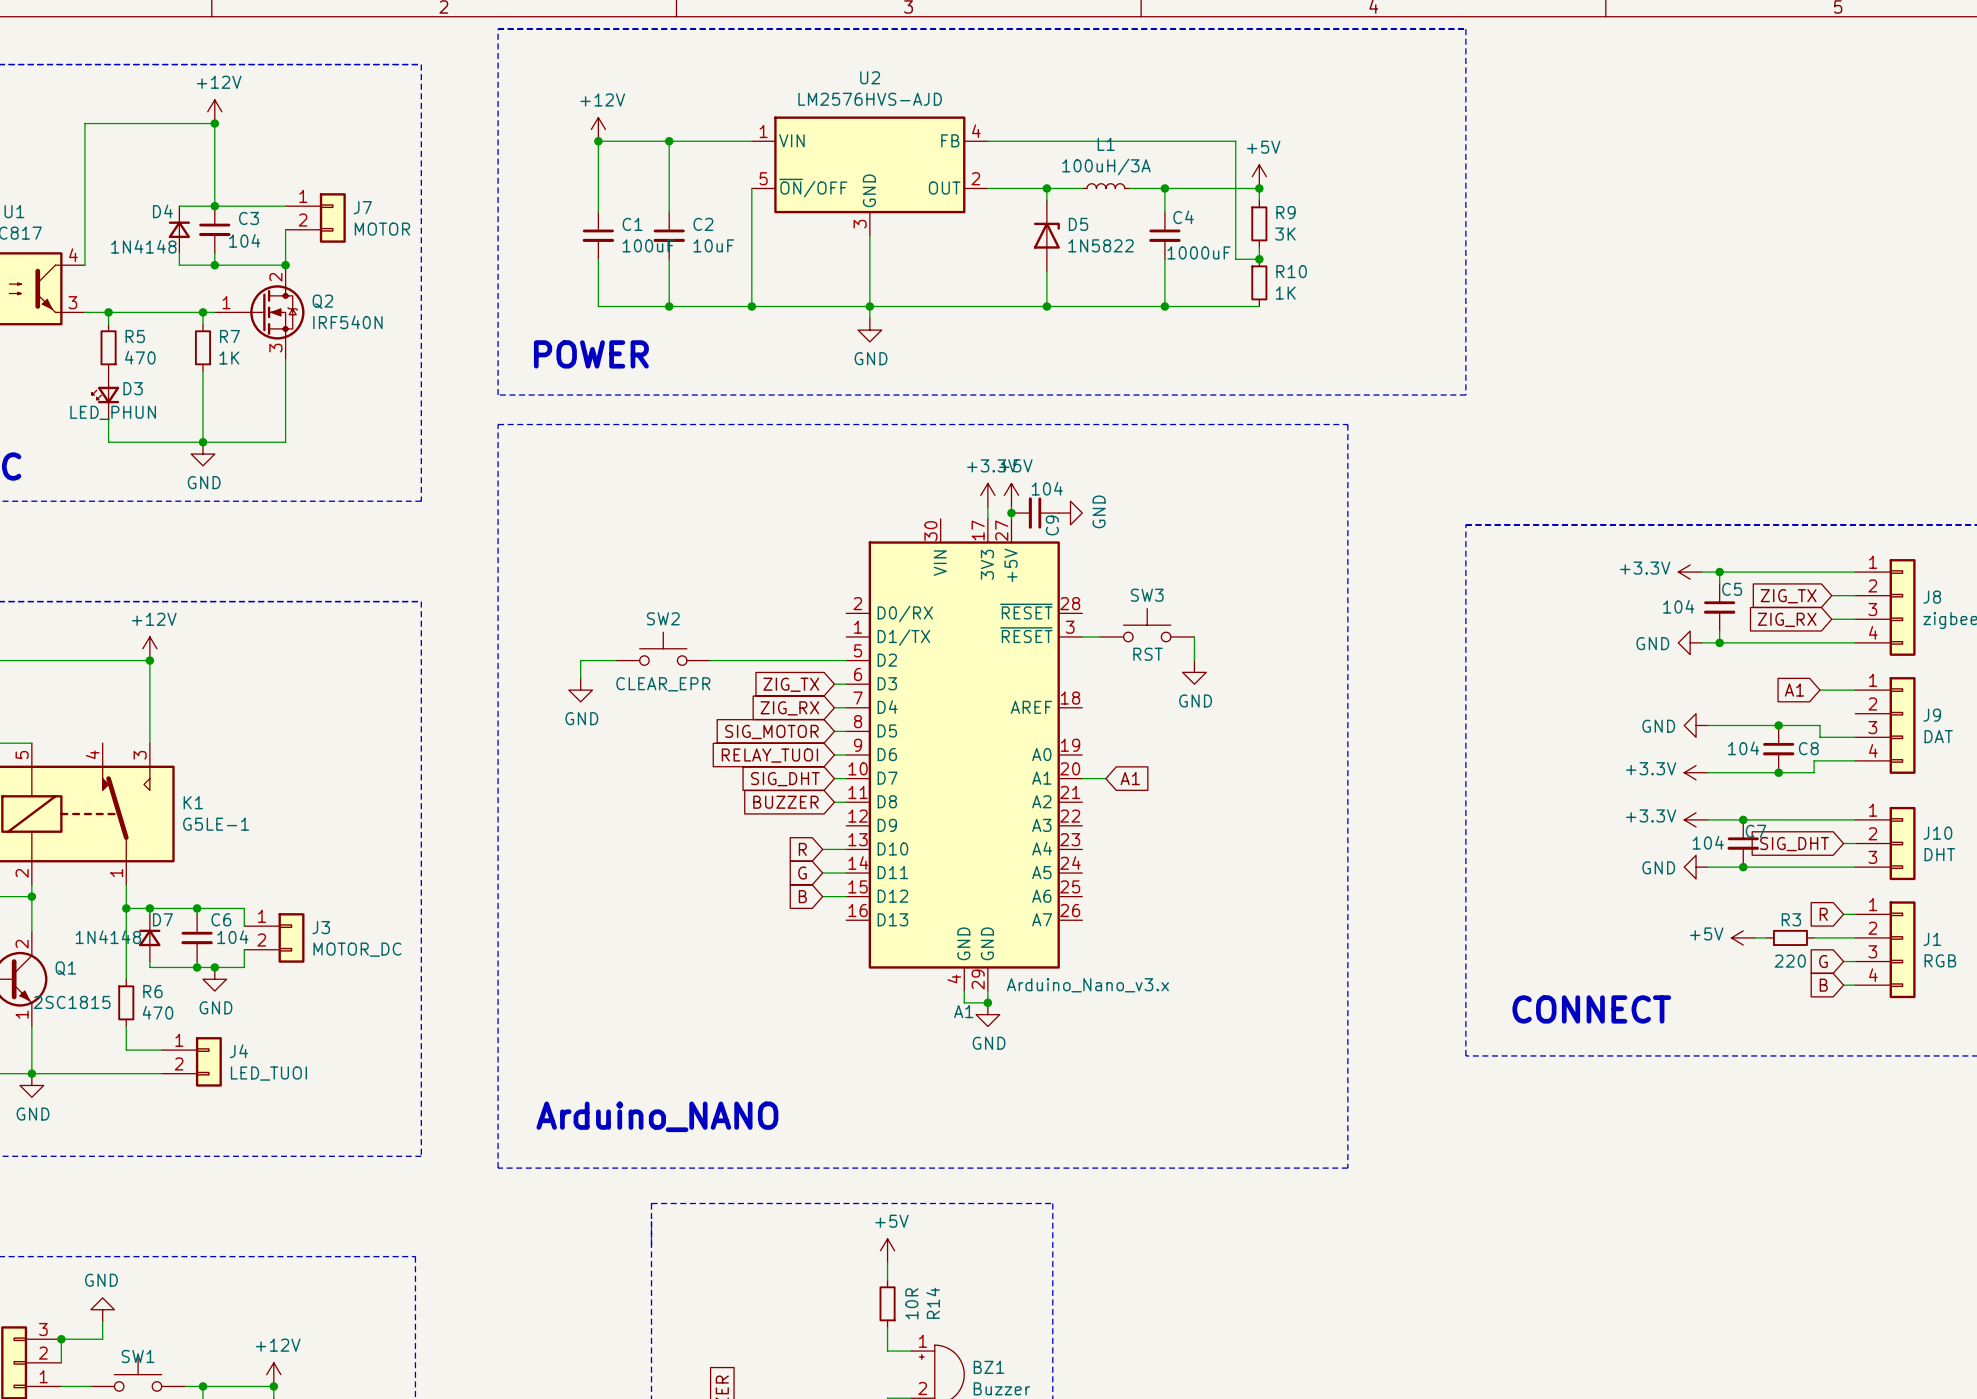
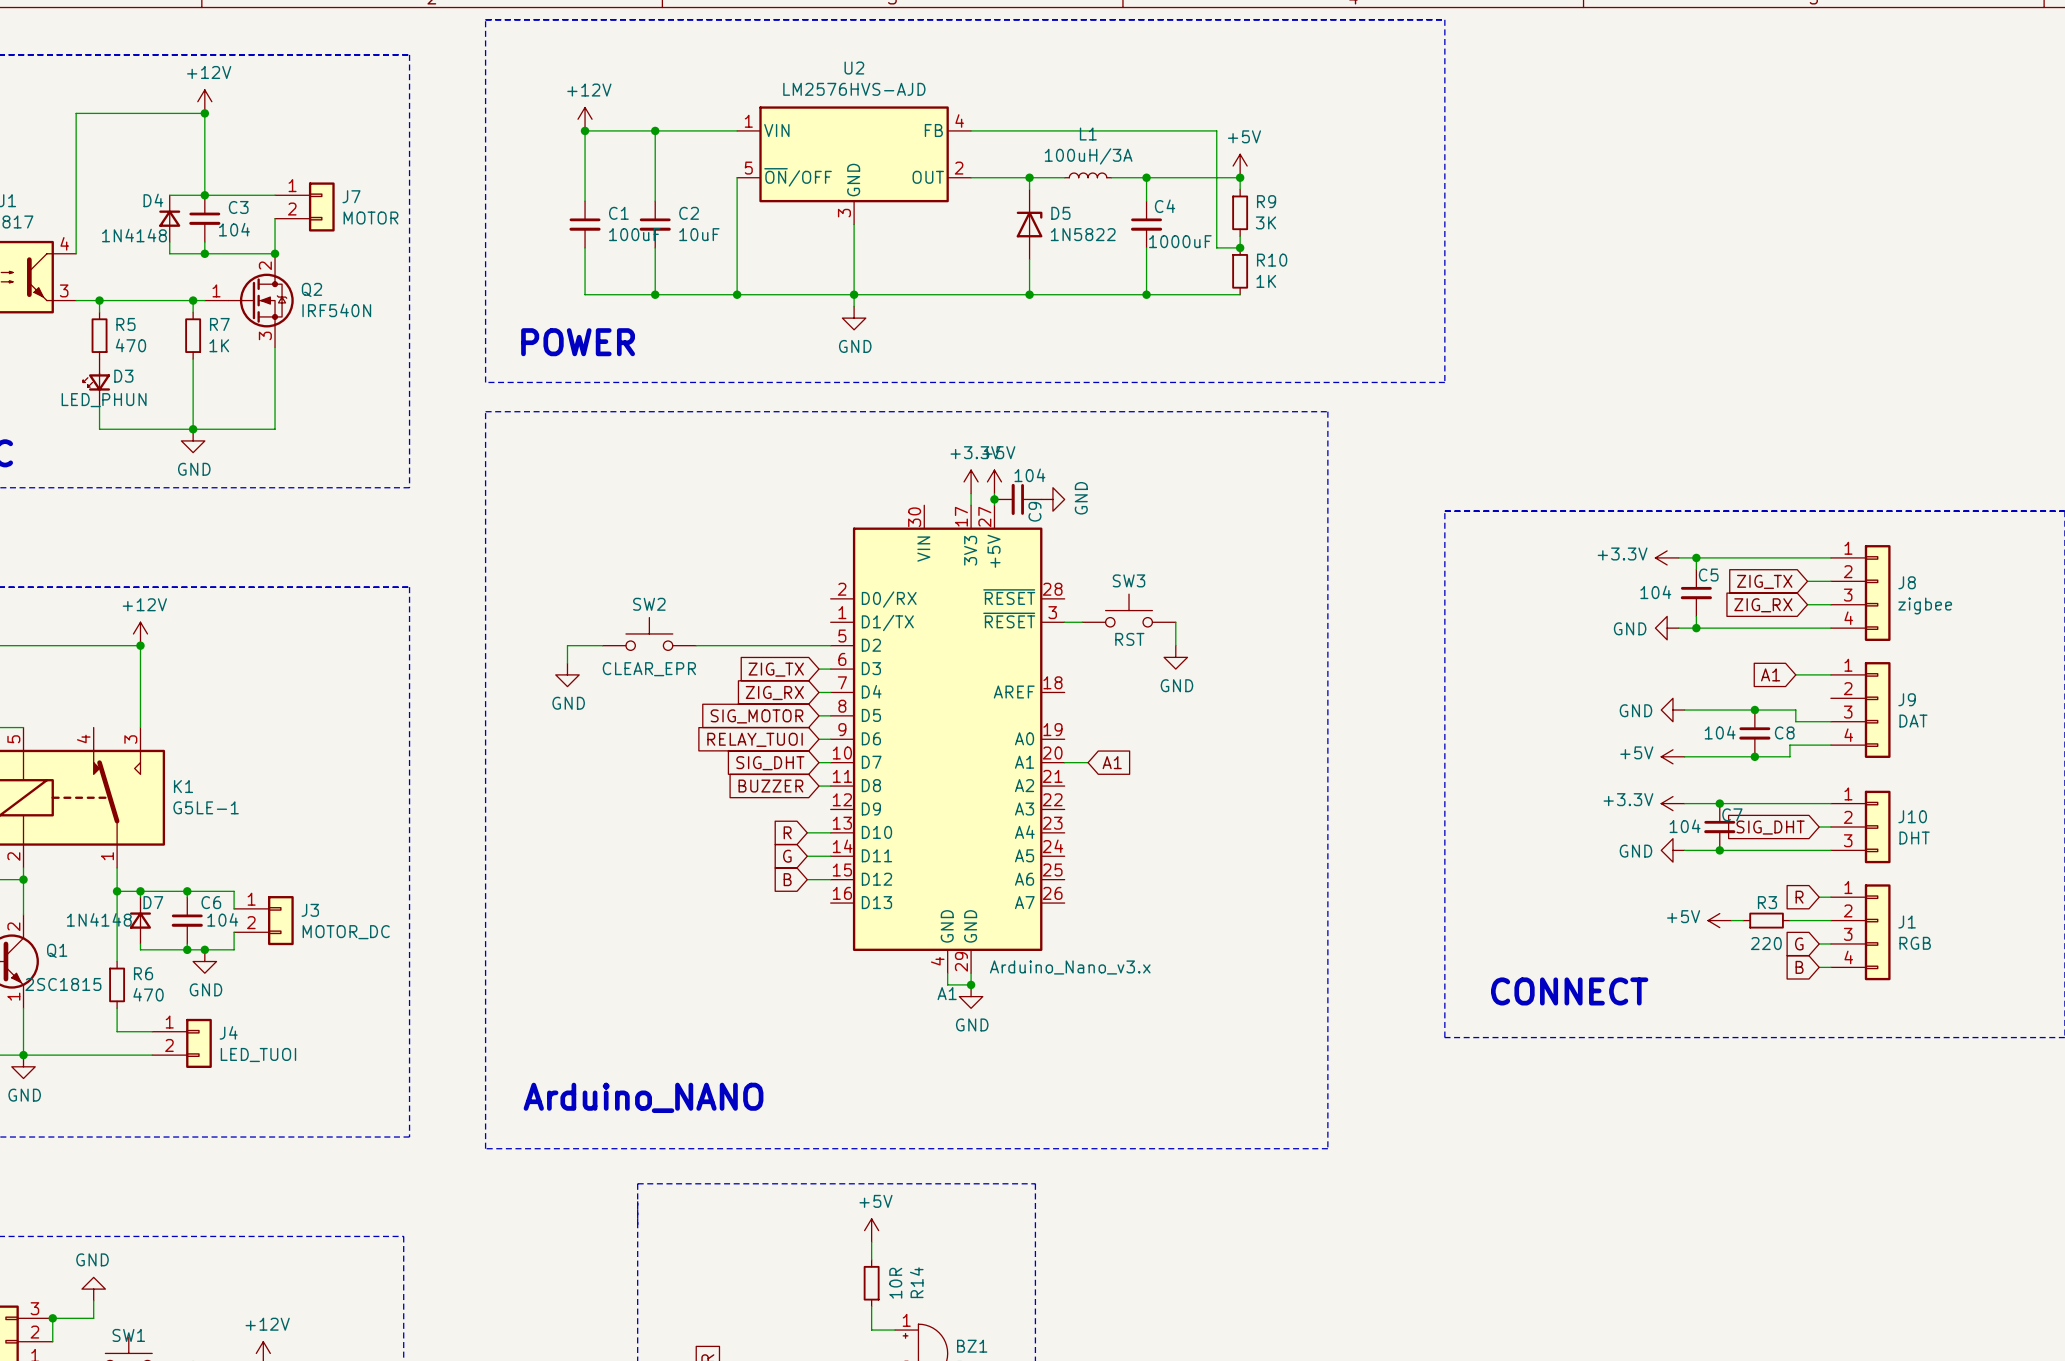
power symbol: +3.3V (1696, 772) -> +5V (1672, 756)

